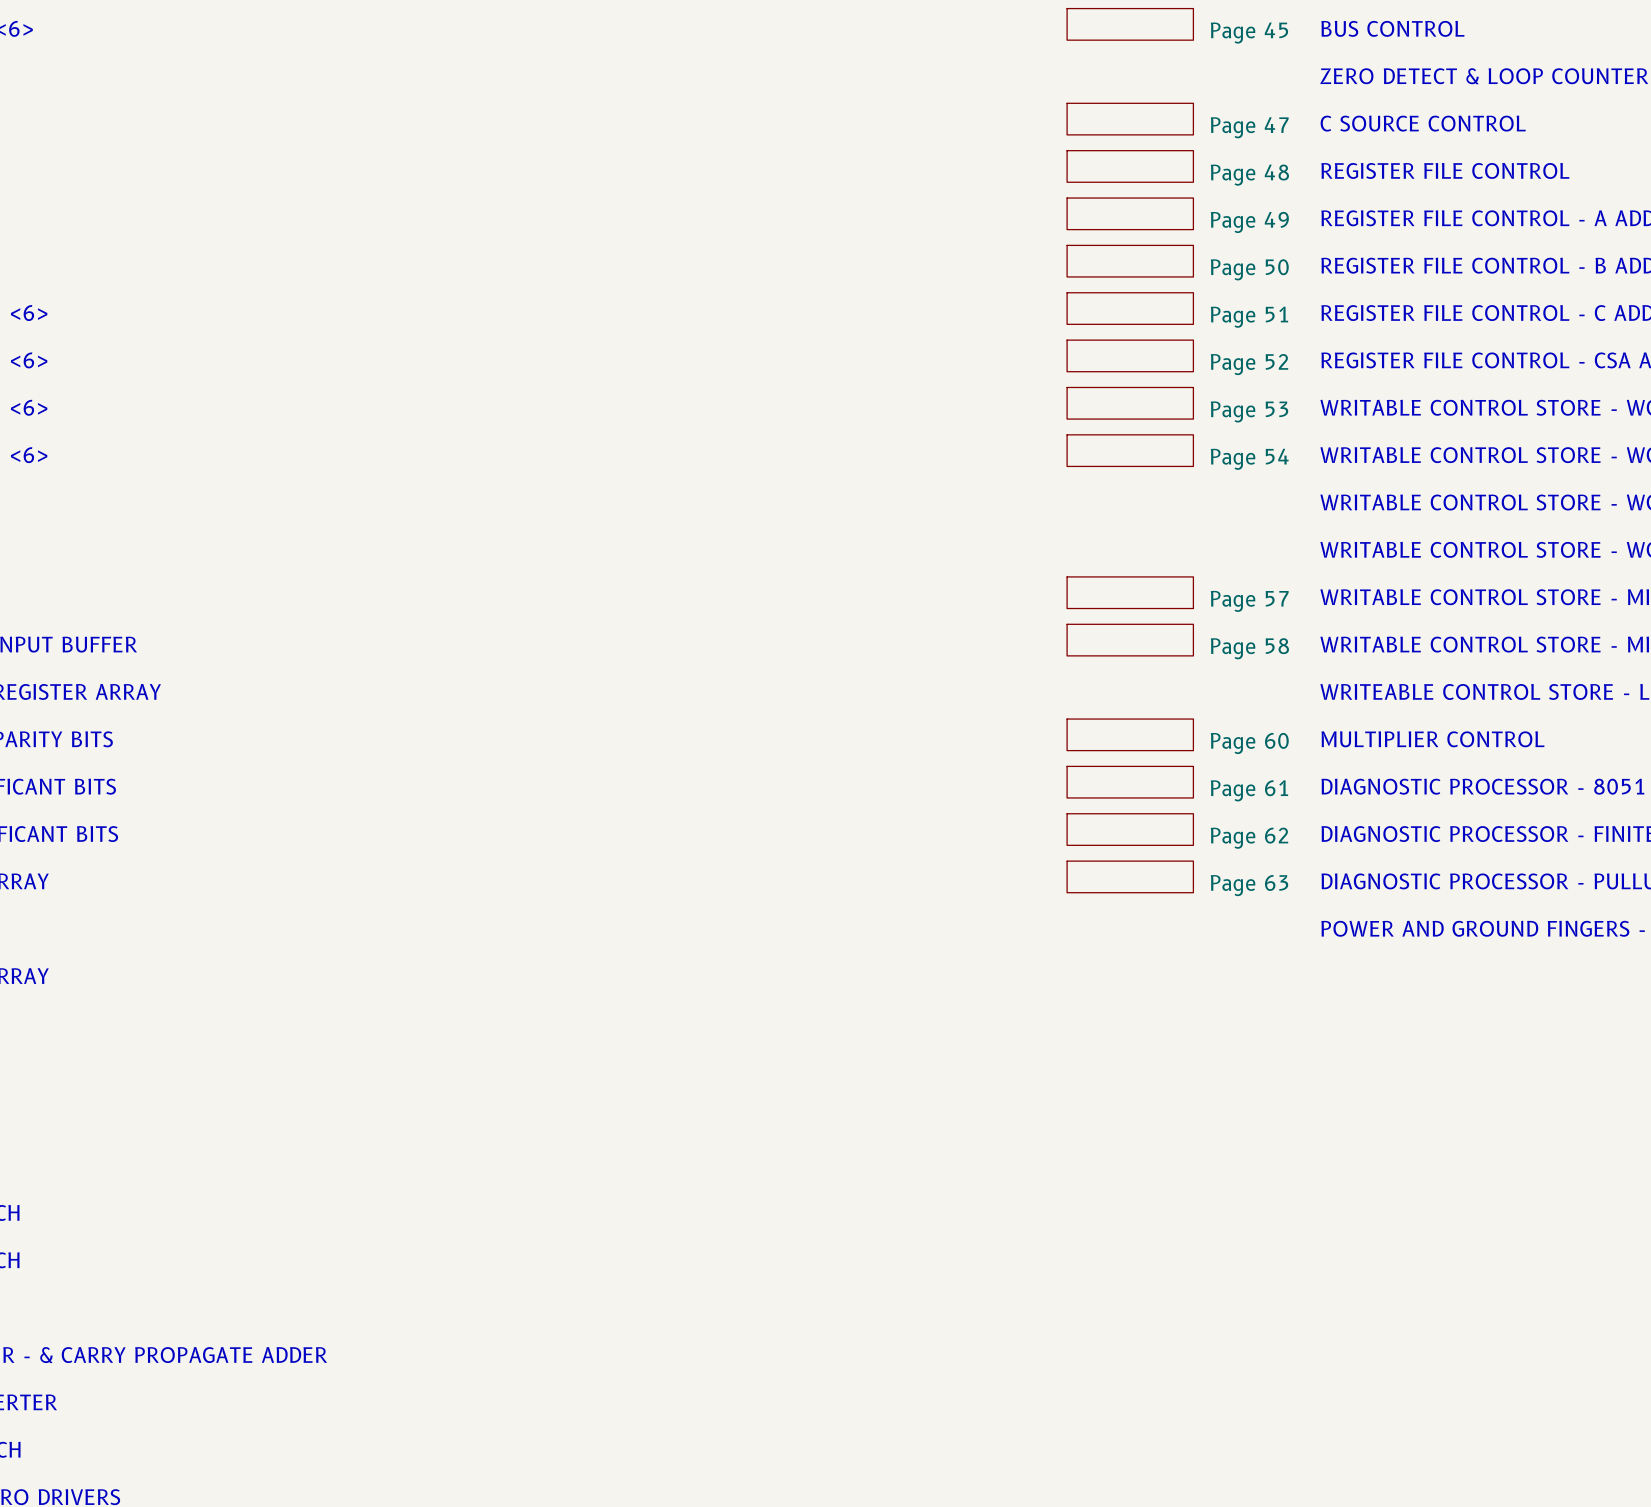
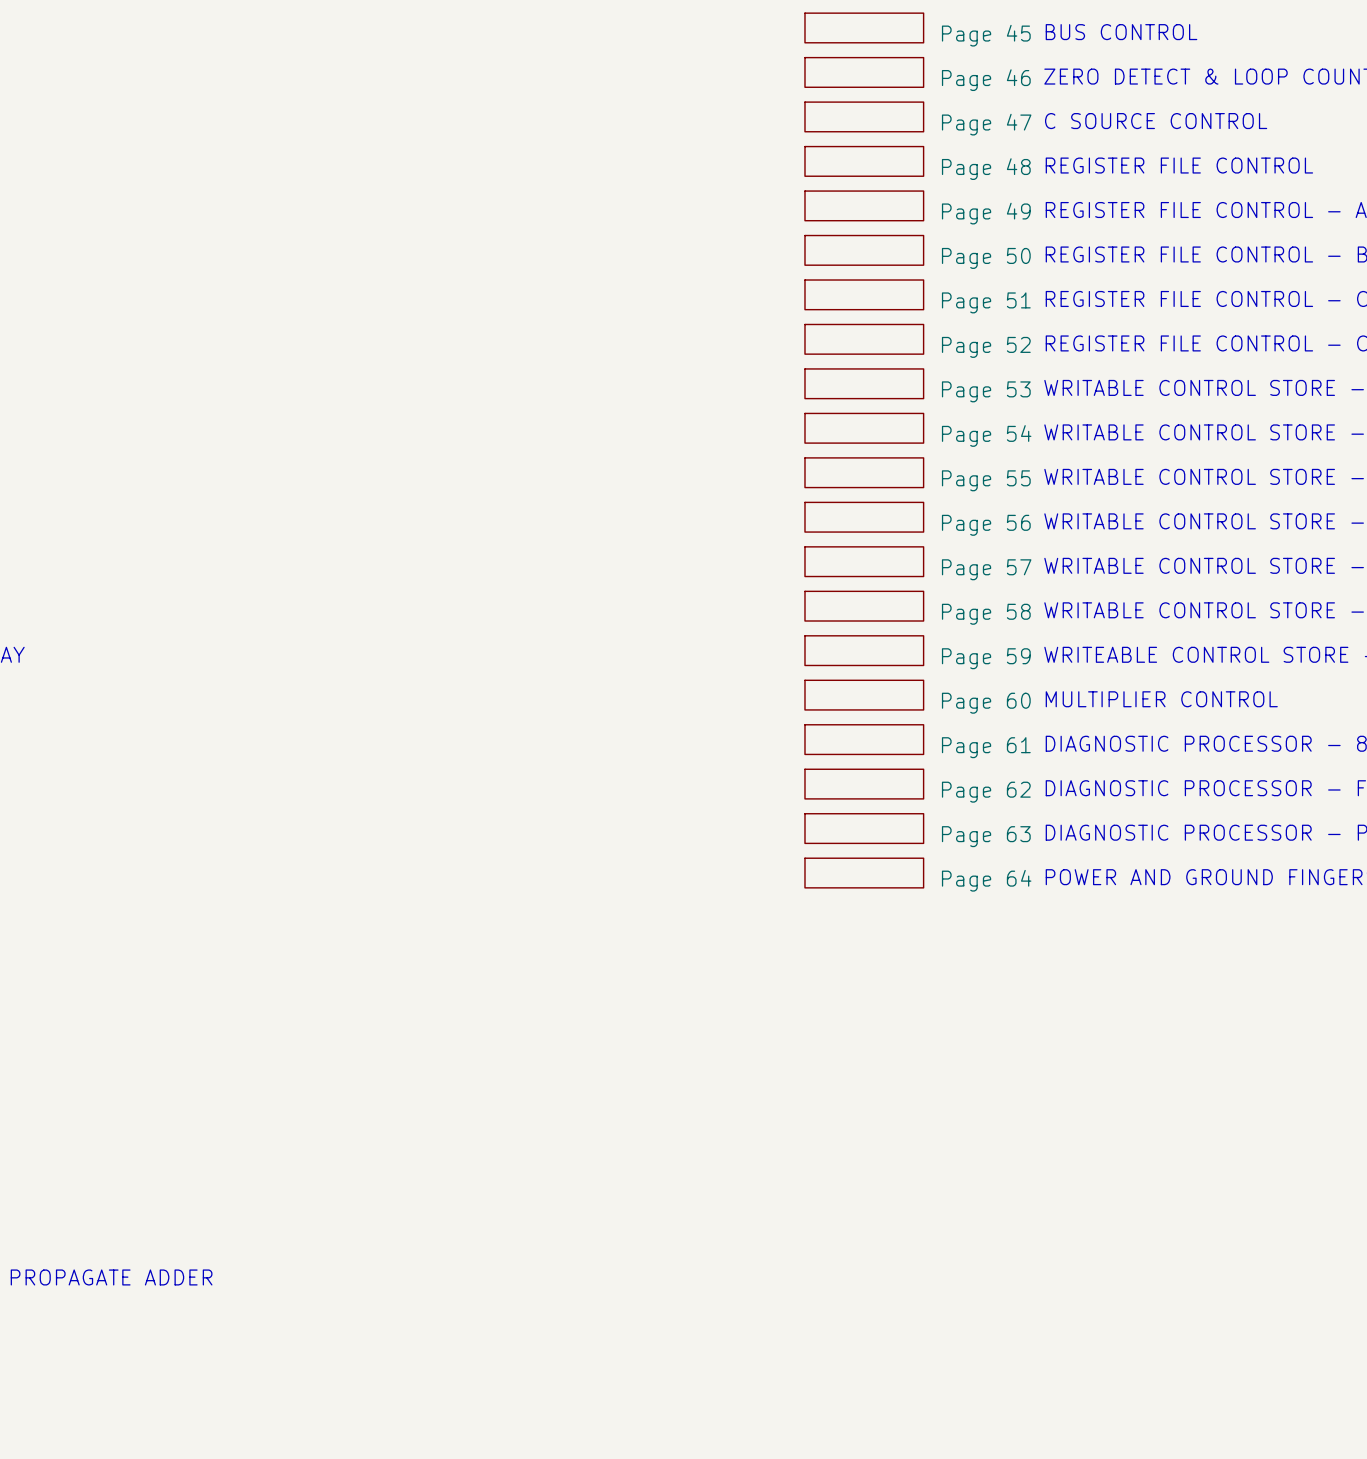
sheet Page 46: none -> (864, 72)
sheet Page 55: none -> (864, 472)
sheet Page 56: none -> (864, 517)
sheet Page 59: none -> (864, 650)
sheet Page 64: none -> (864, 873)

